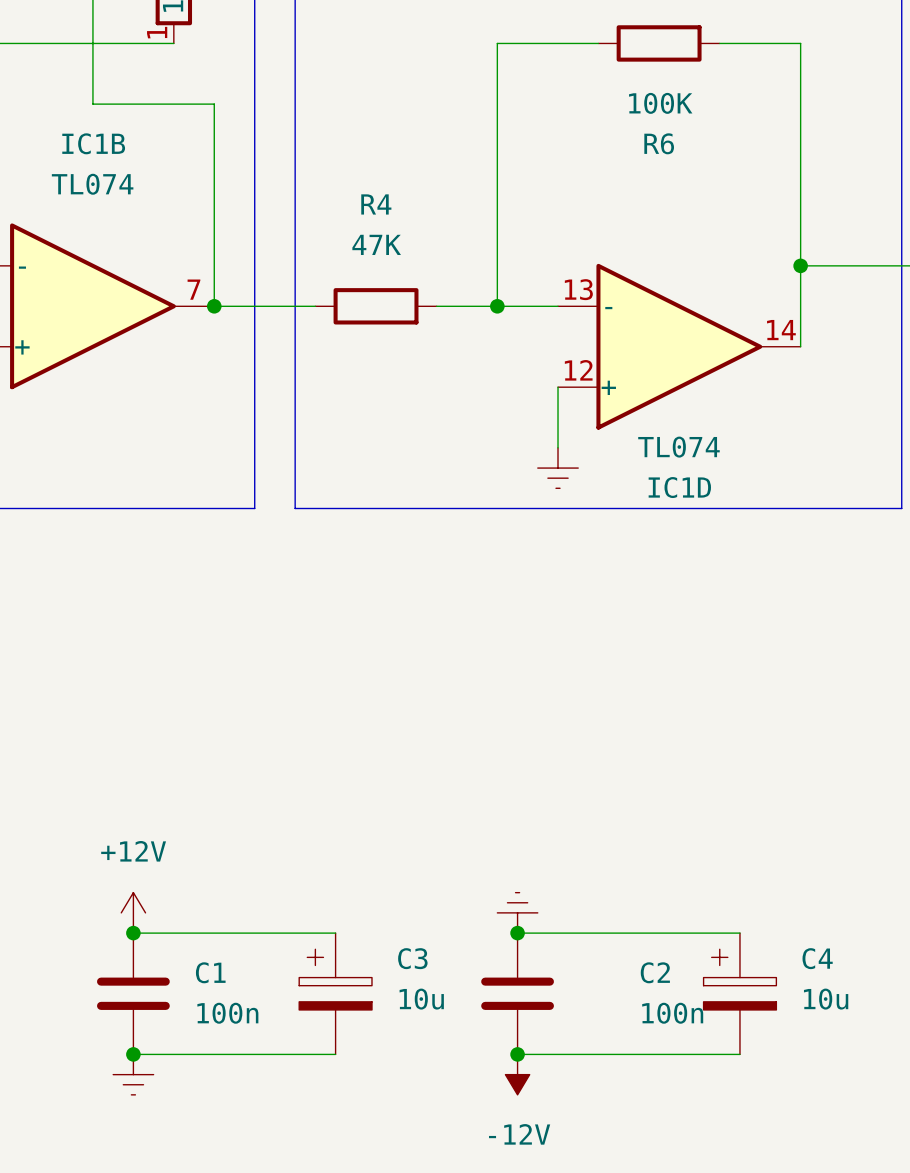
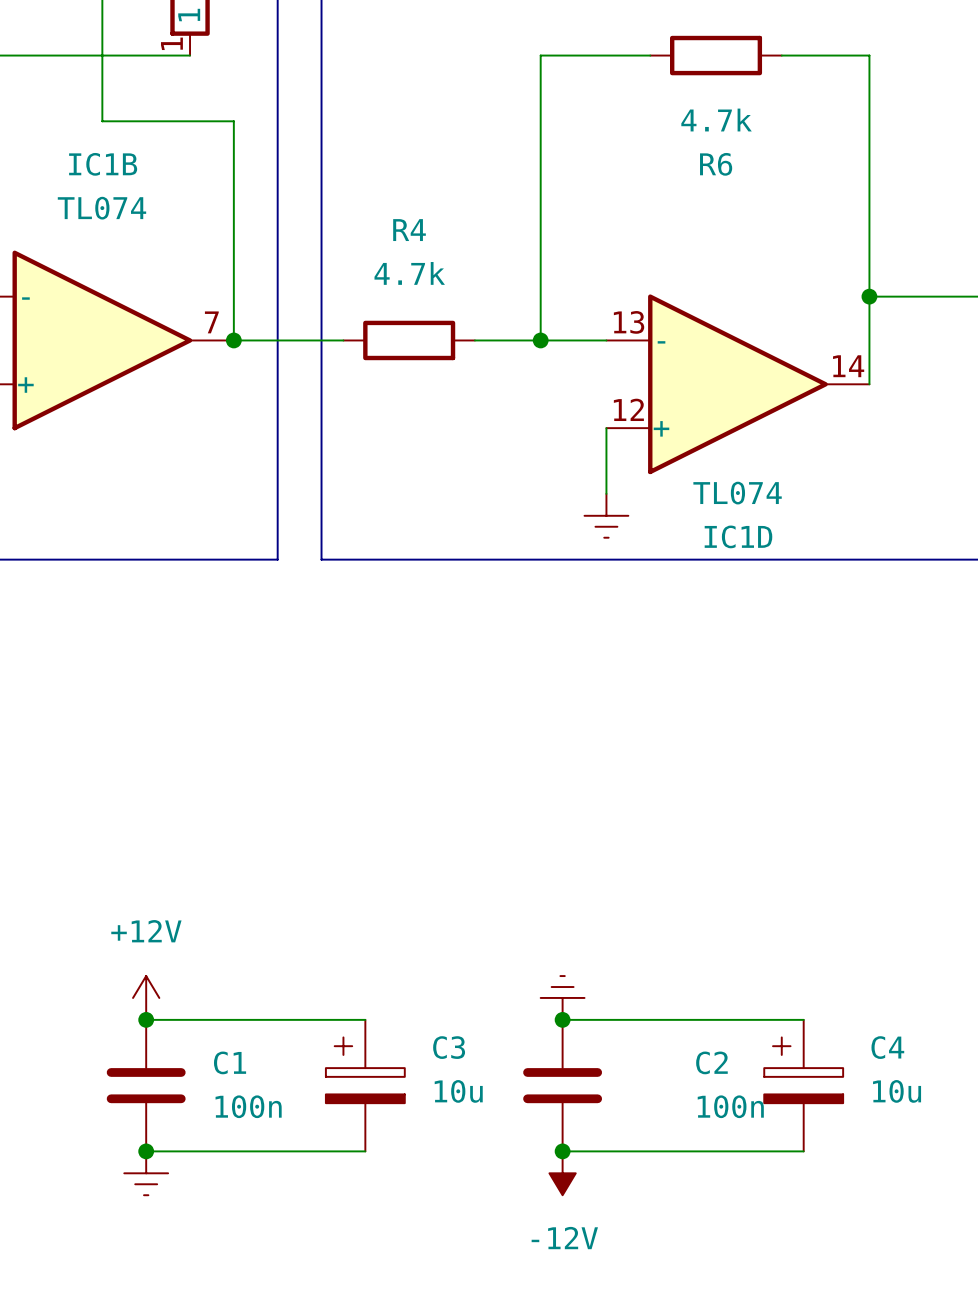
R6 value: 100K (660, 103) -> 4.7k (716, 120)
R4 value: 47K (376, 244) -> 4.7k (409, 273)

